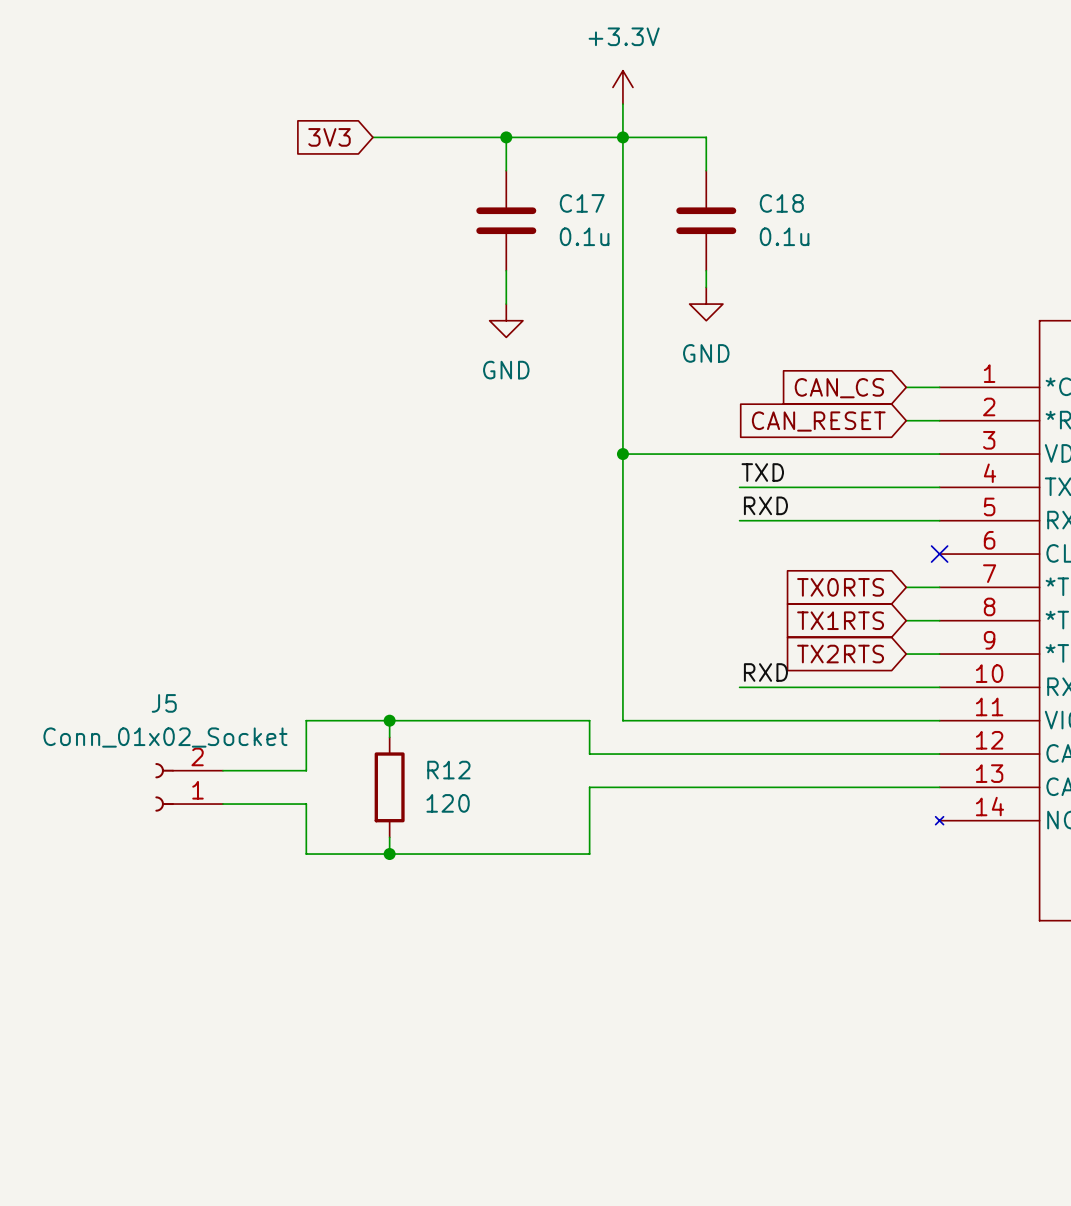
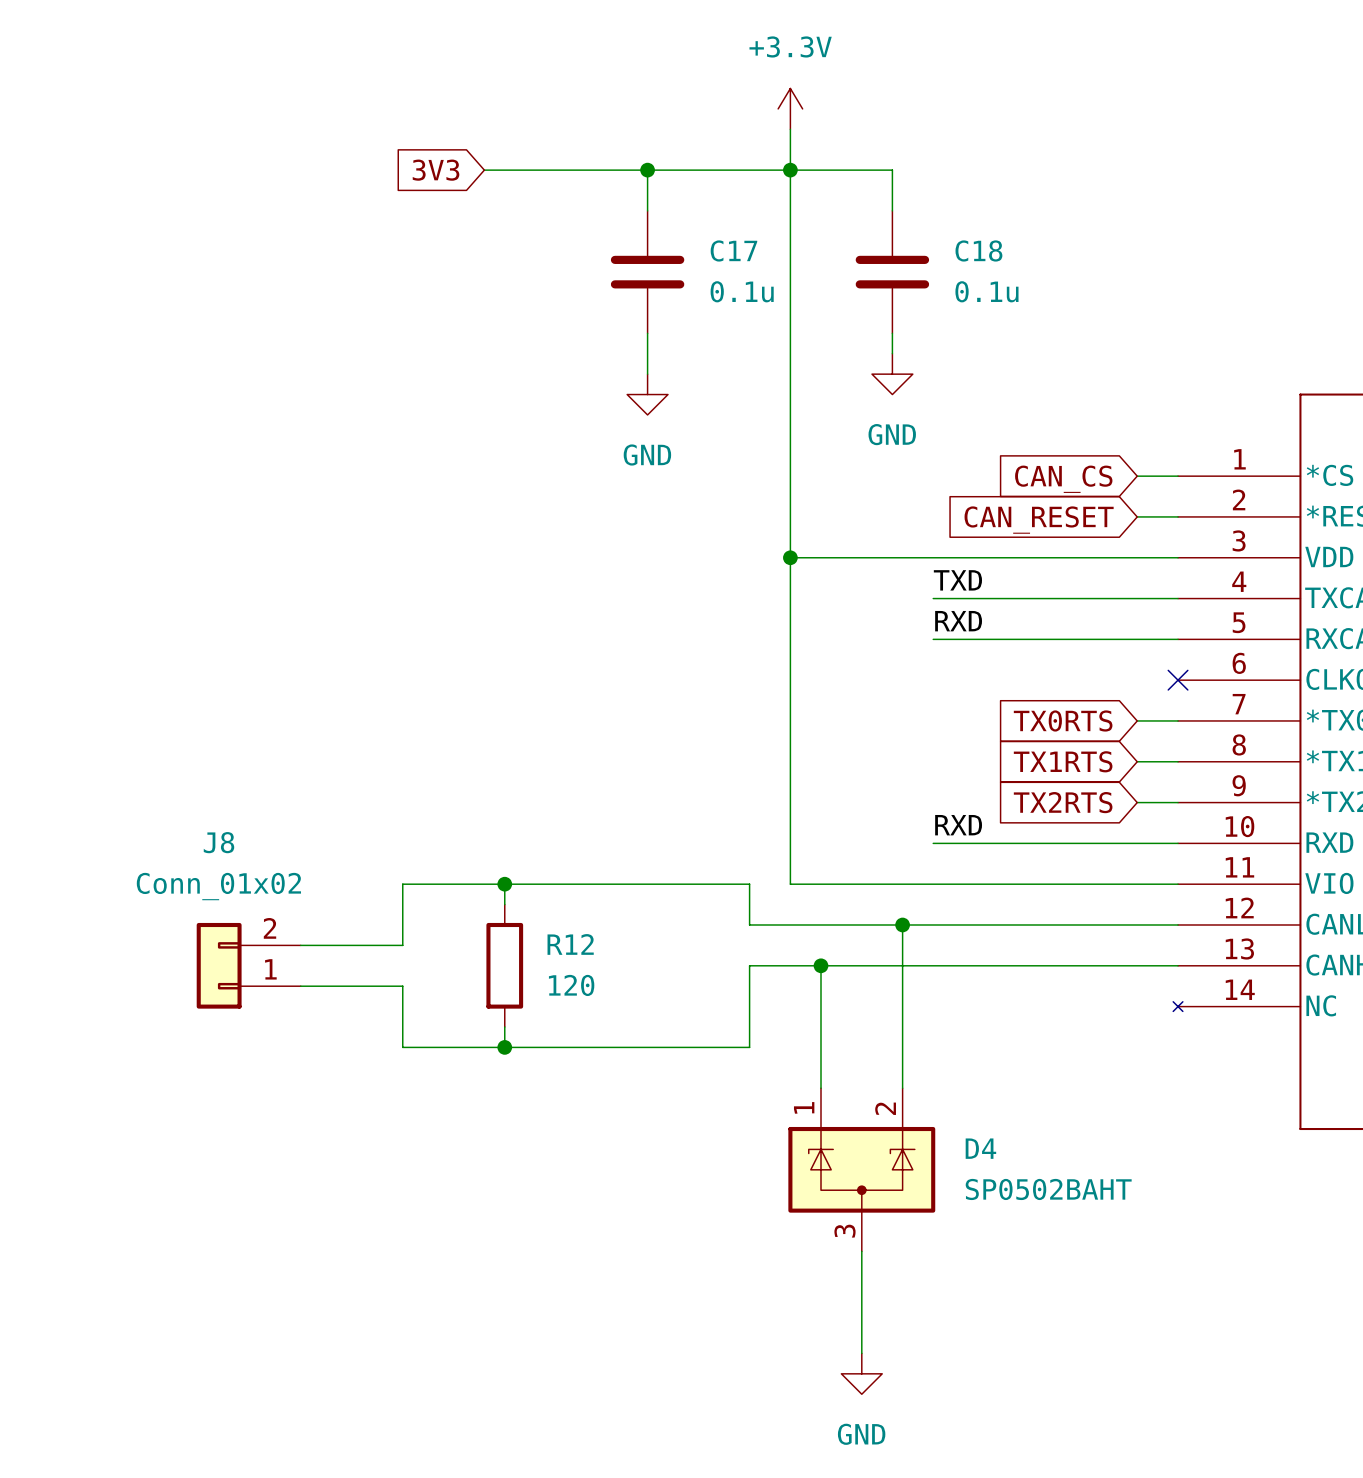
wire: none -> (902, 924) (902, 1088)
junction: none -> (902, 924)
J8: none -> Conn_01x02 (248, 965)
J5: Conn_01x02_Socket (189, 787) -> none
wire: none -> (821, 965) (821, 1088)
junction: none -> (821, 965)
D4: none -> SP0502BAHT (861, 1169)
wire: none -> (861, 1251) (861, 1353)
power symbol: none -> GND (861, 1373)

